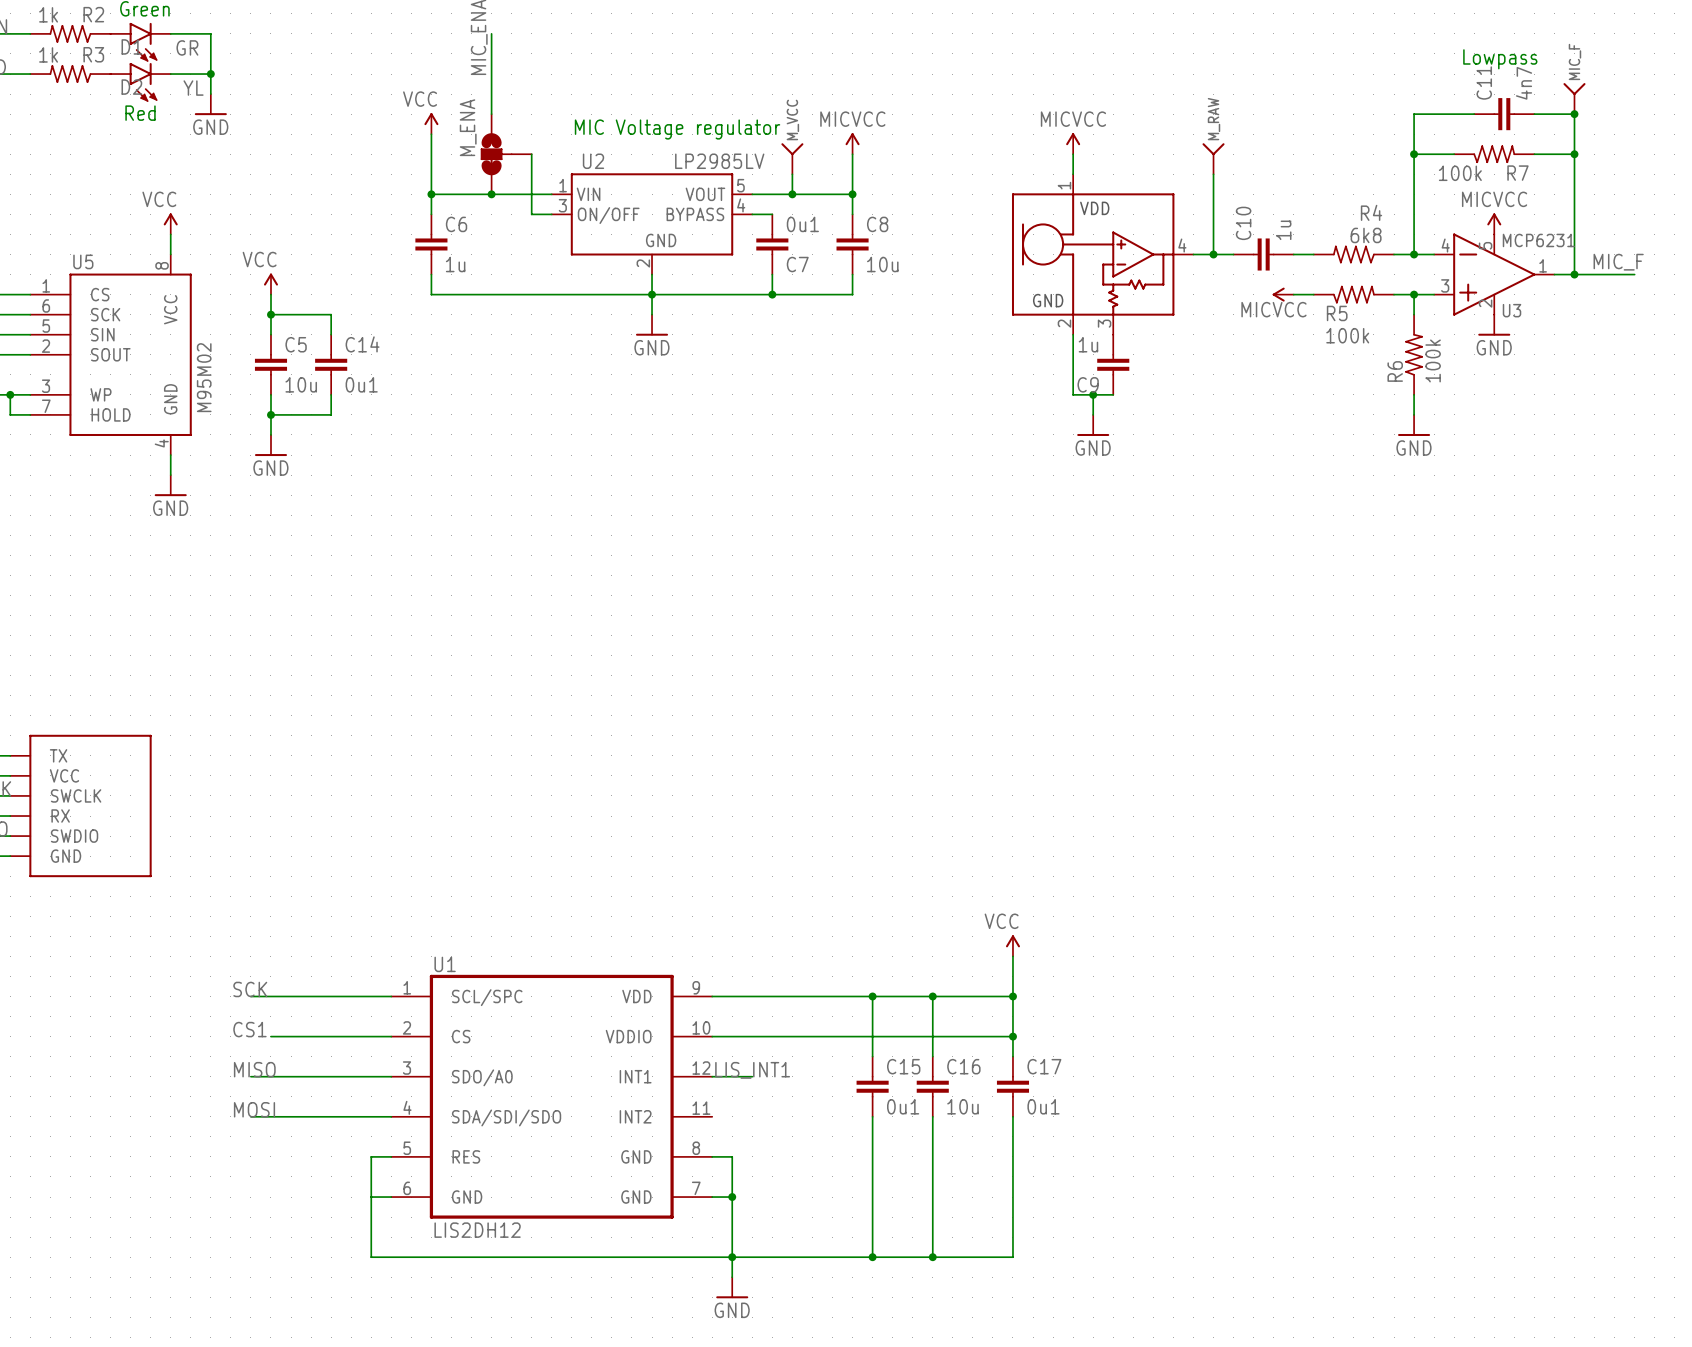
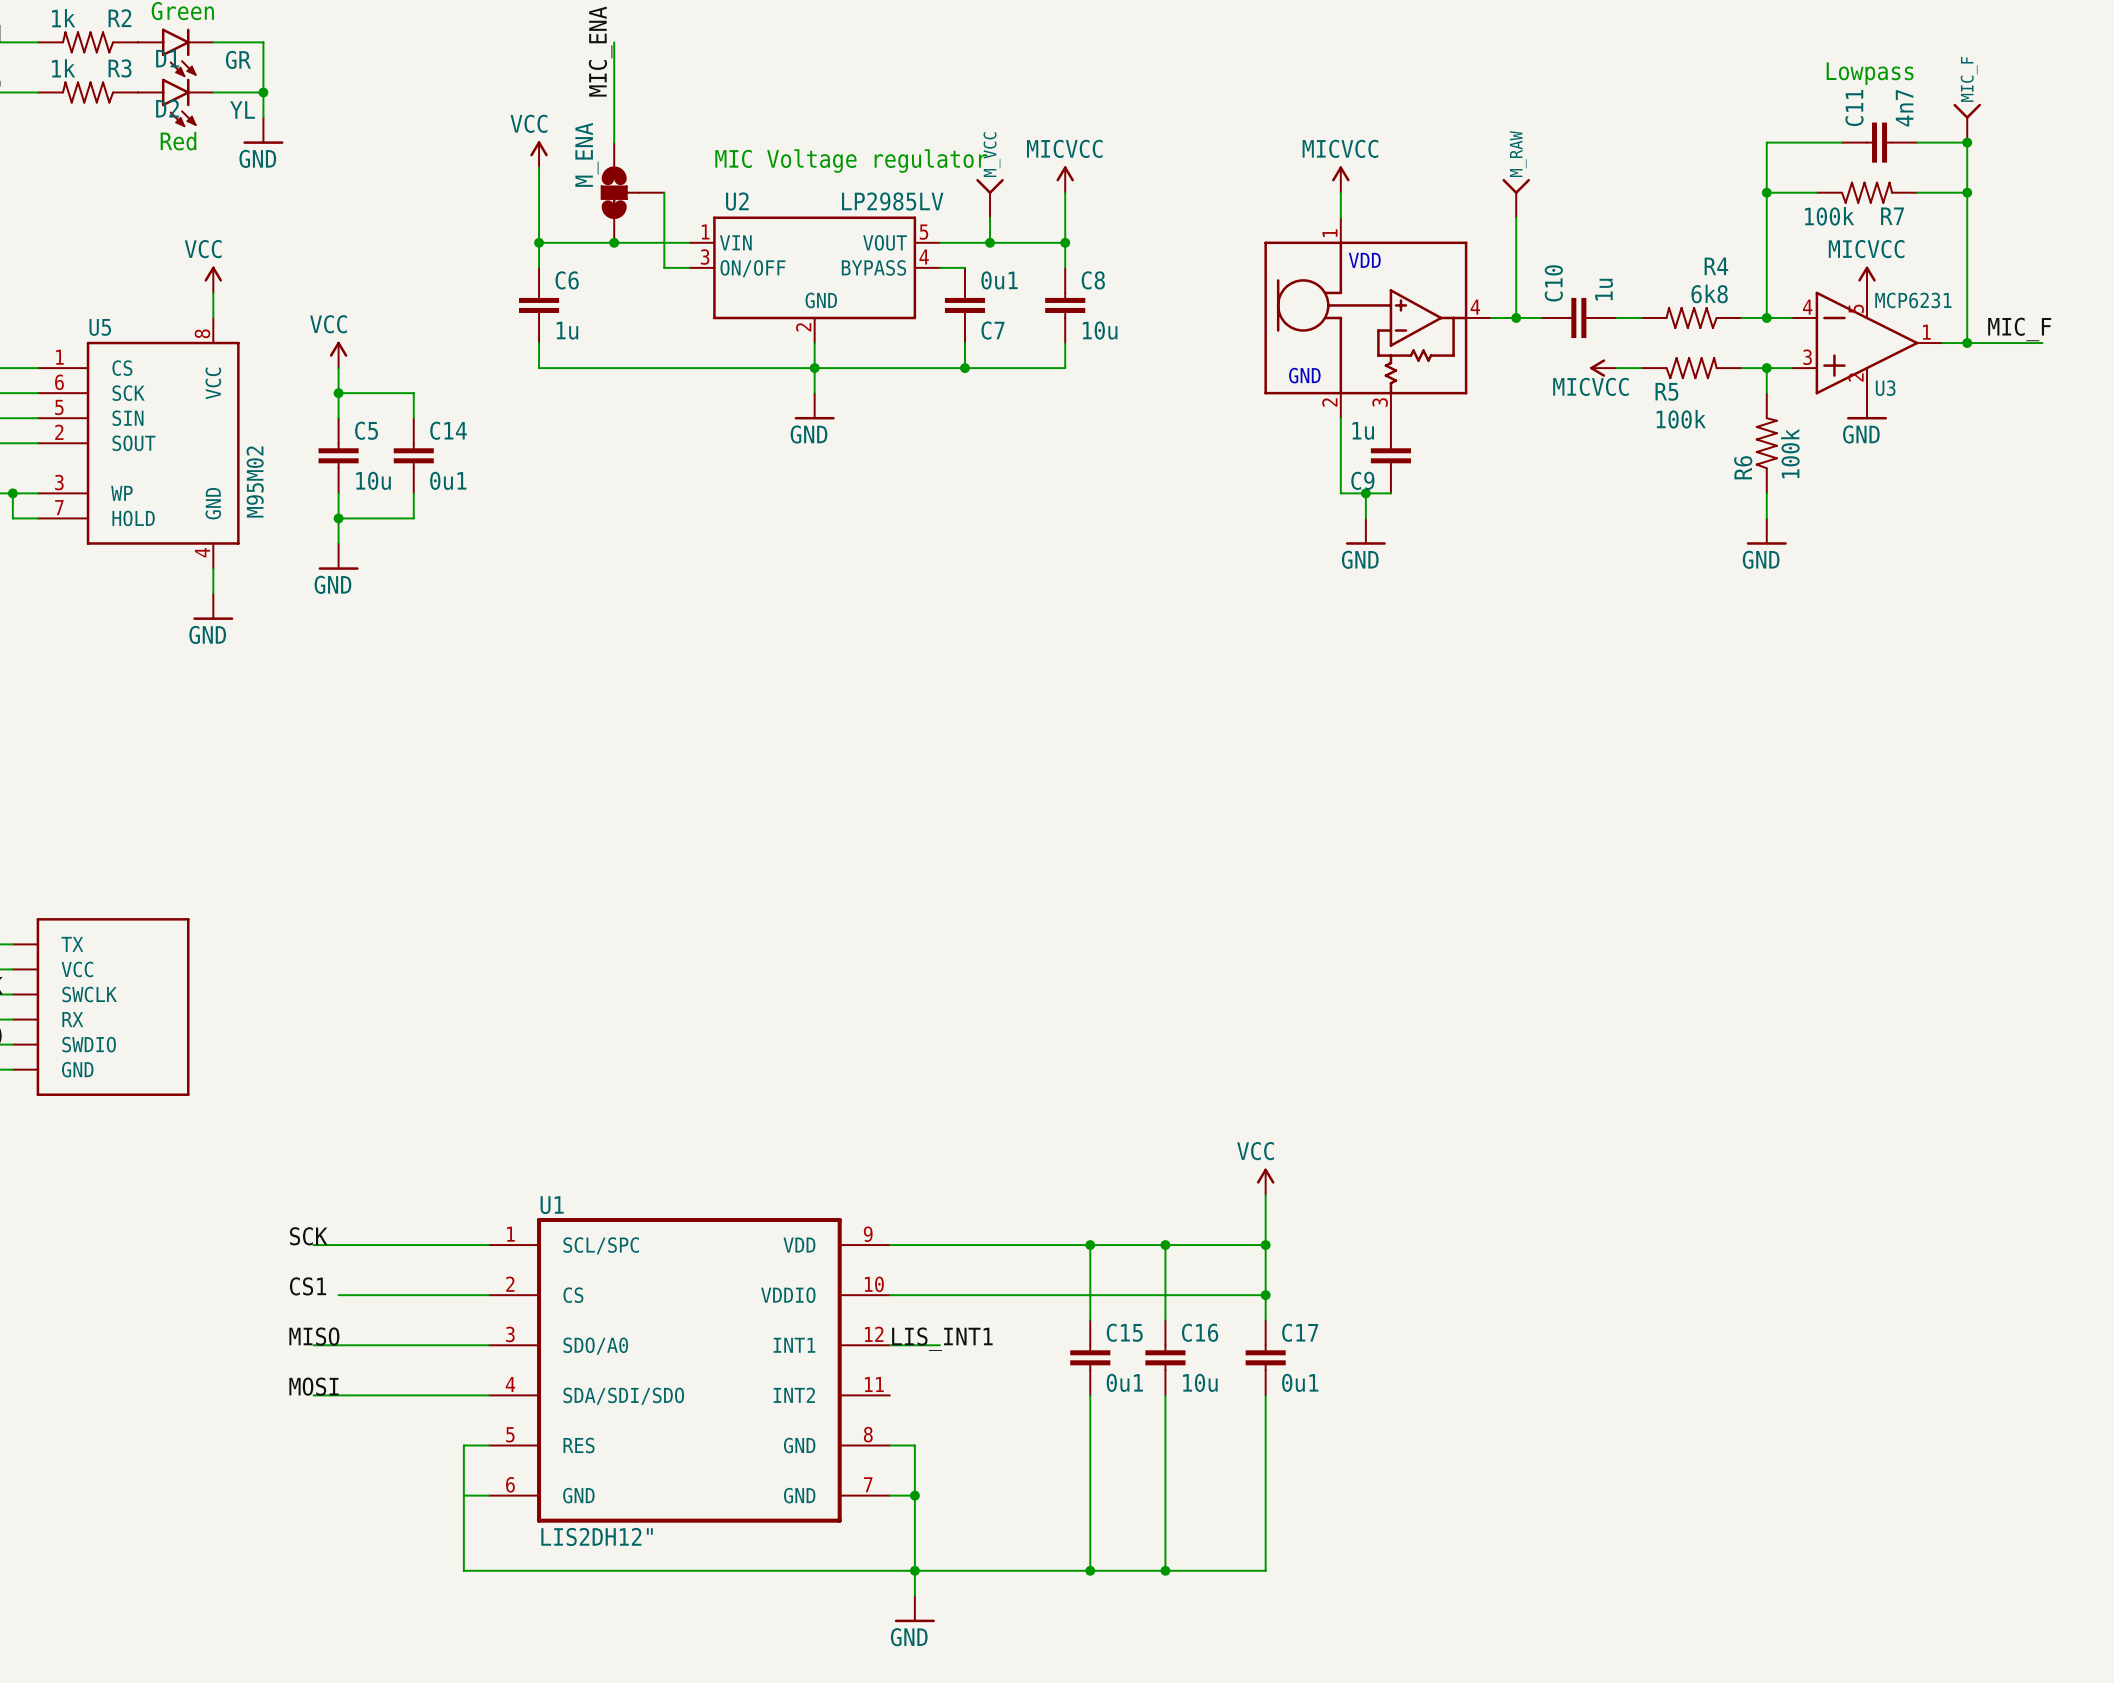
U1 value: LIS2DH12 (477, 1230) -> LIS2DH12" (597, 1536)

